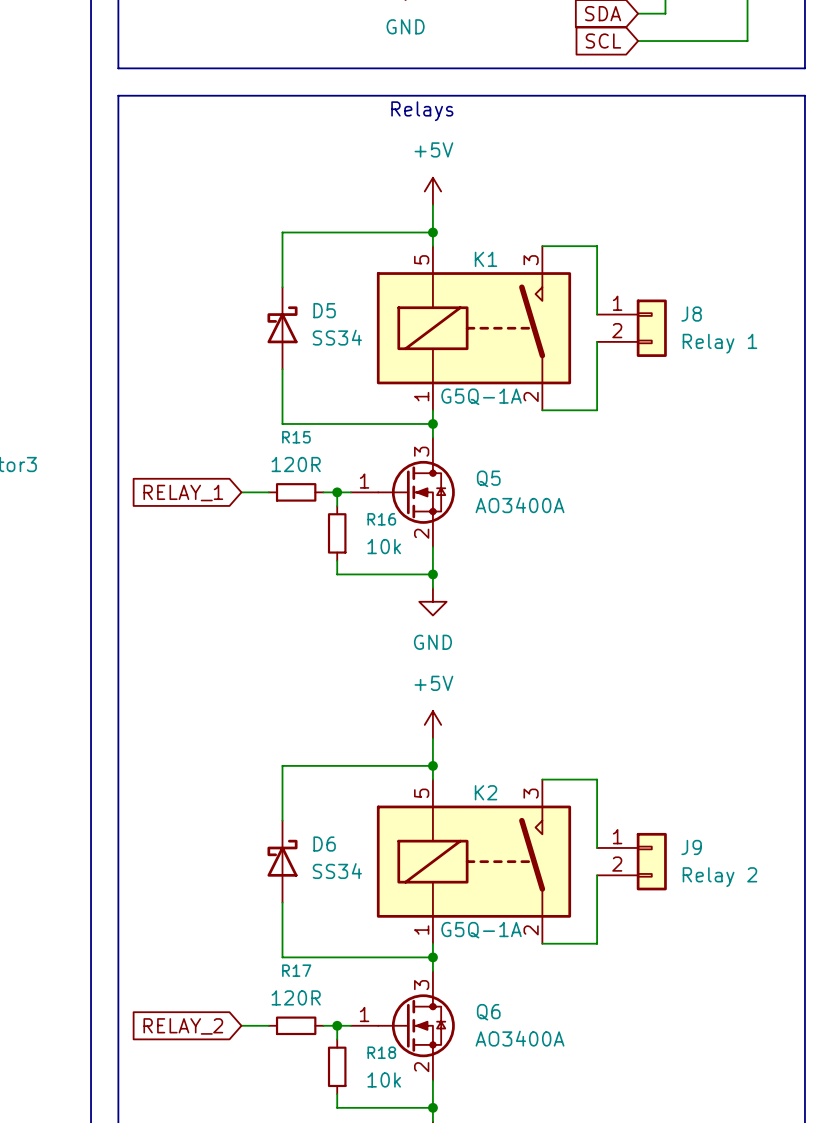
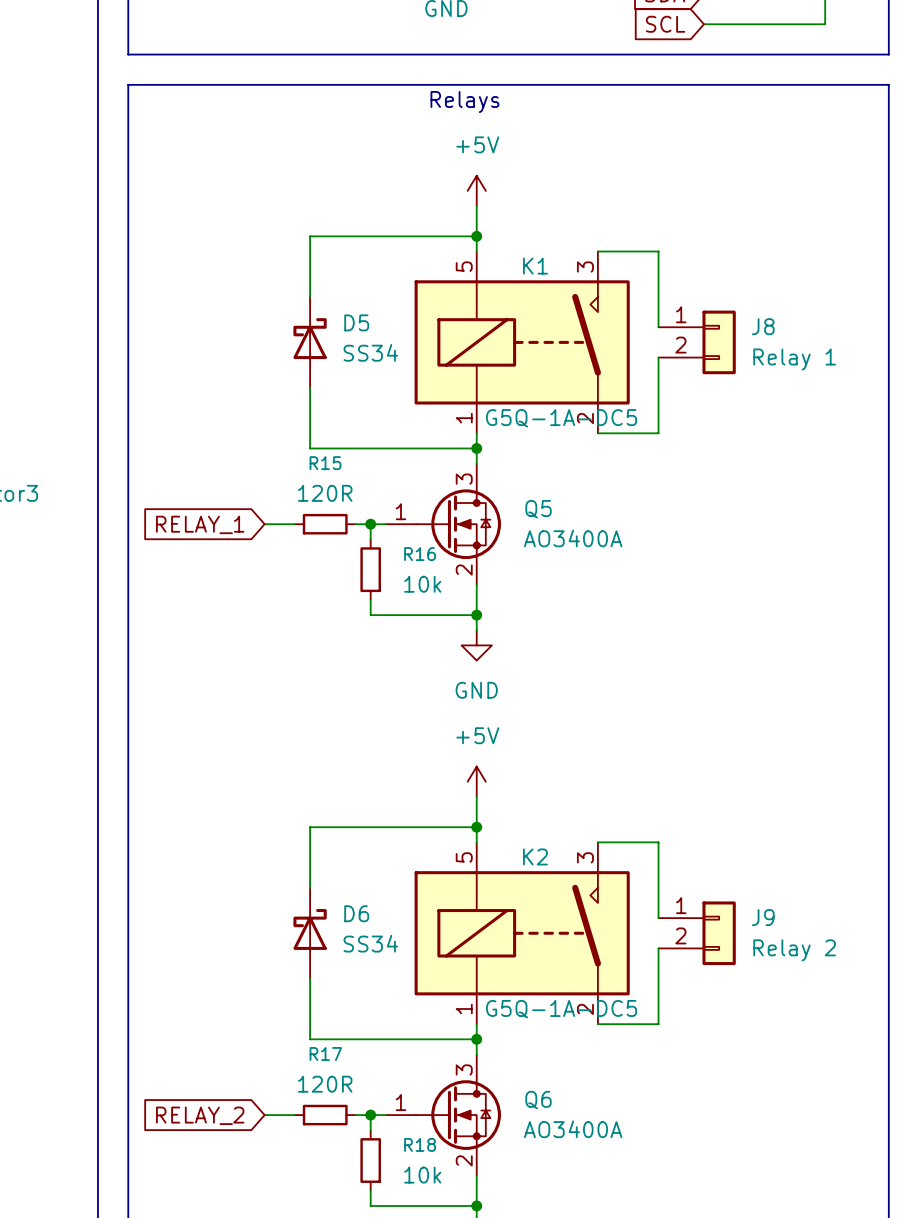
K1 value: G5Q-1A (481, 396) -> G5Q-1A-DC5 (561, 418)
K2 value: G5Q-1A (481, 930) -> G5Q-1A-DC5 (561, 1009)

